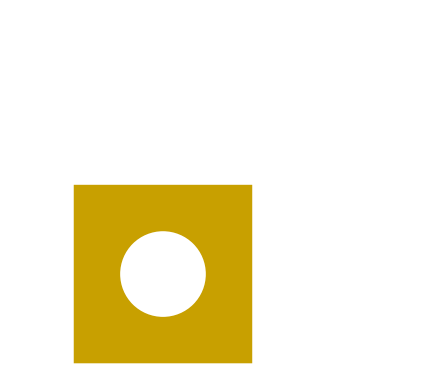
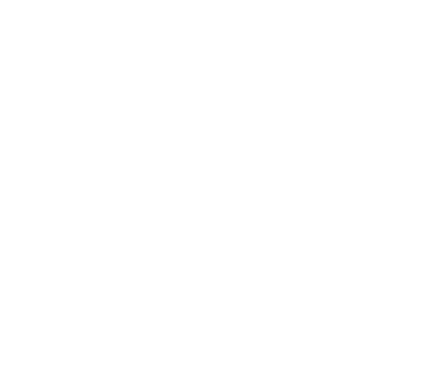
part: (162, 274) -> none

